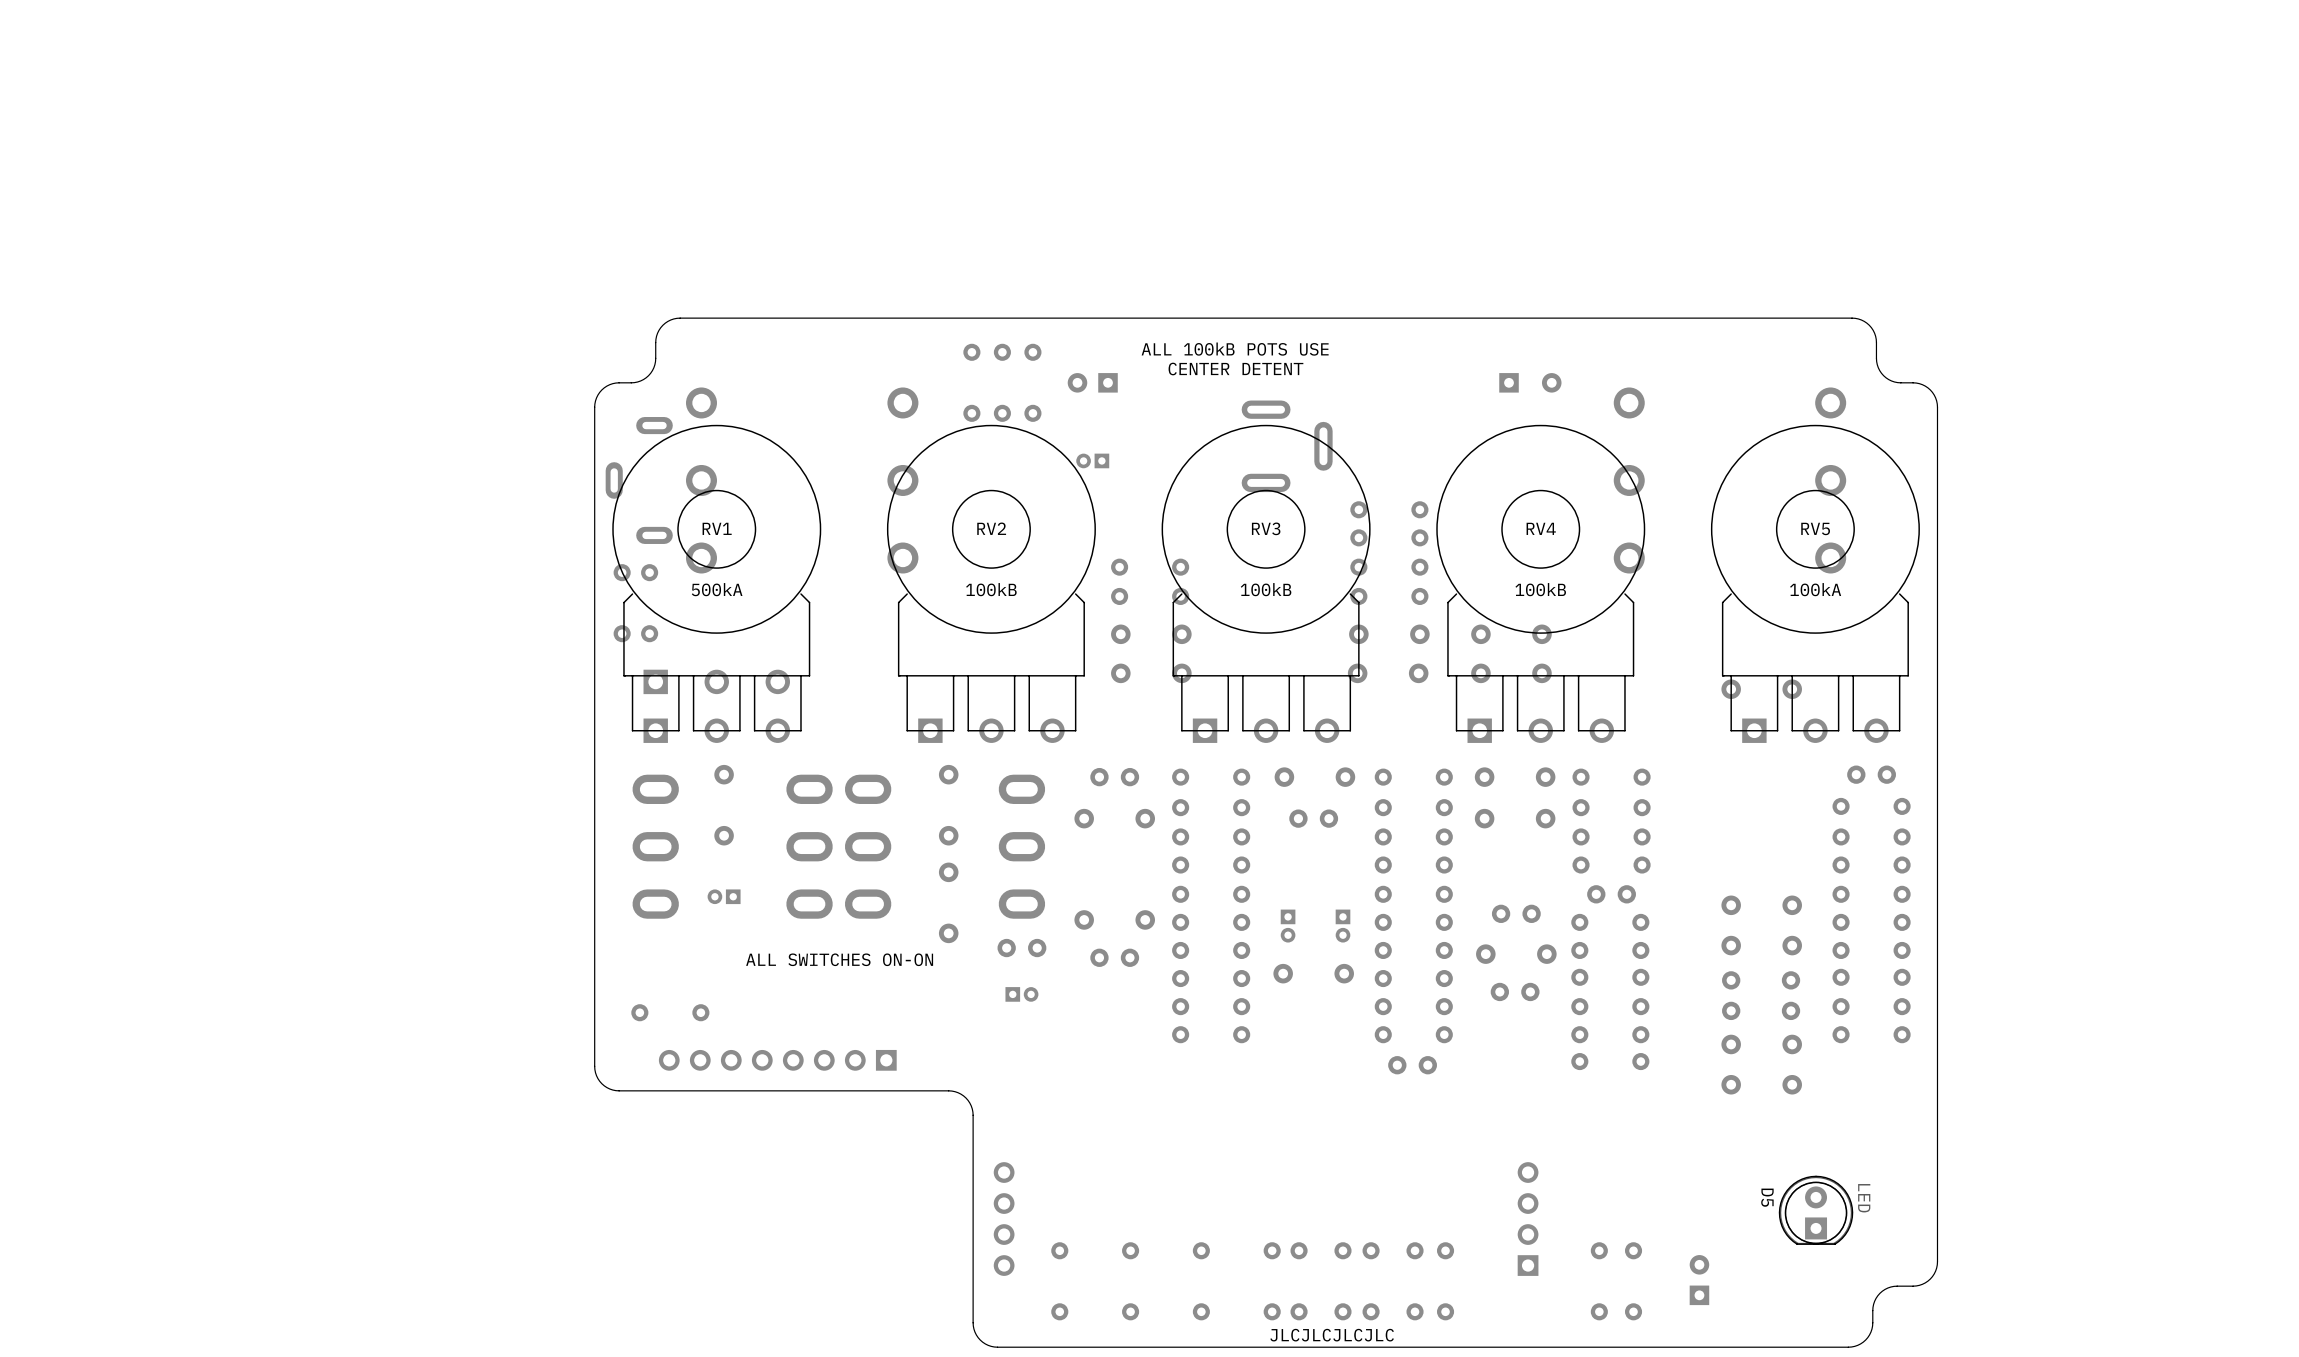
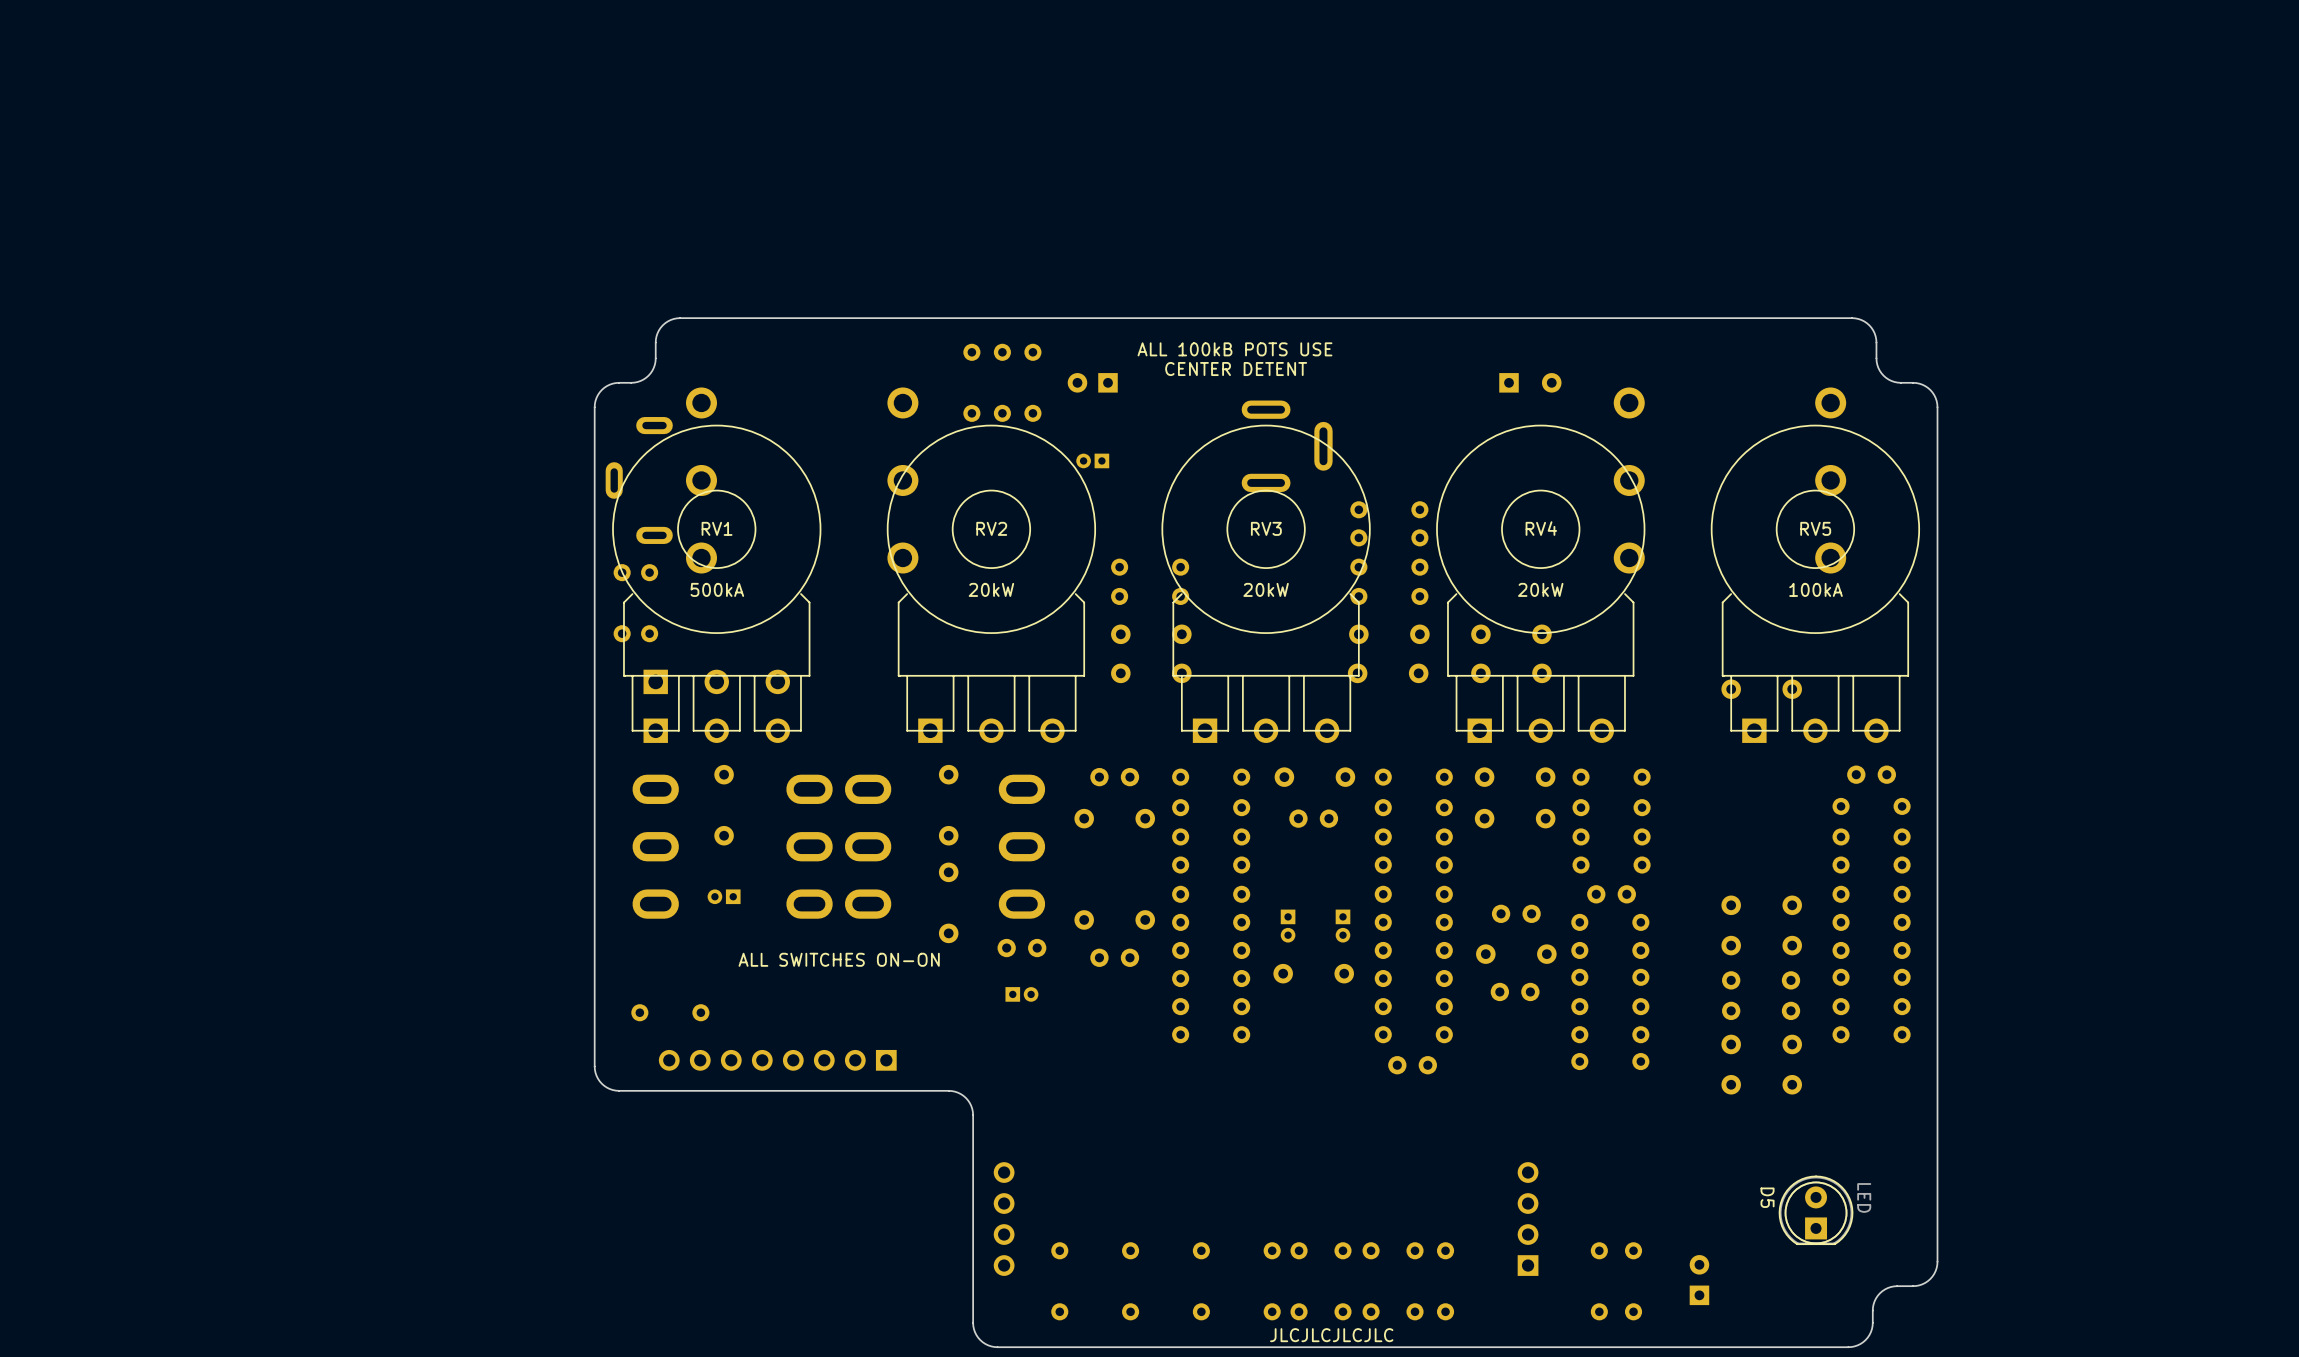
RV2 value: 100kB (991, 589) -> 20kW (991, 589)
RV3 value: 100kB (1266, 589) -> 20kW (1266, 589)
RV4 value: 100kB (1540, 589) -> 20kW (1540, 589)

